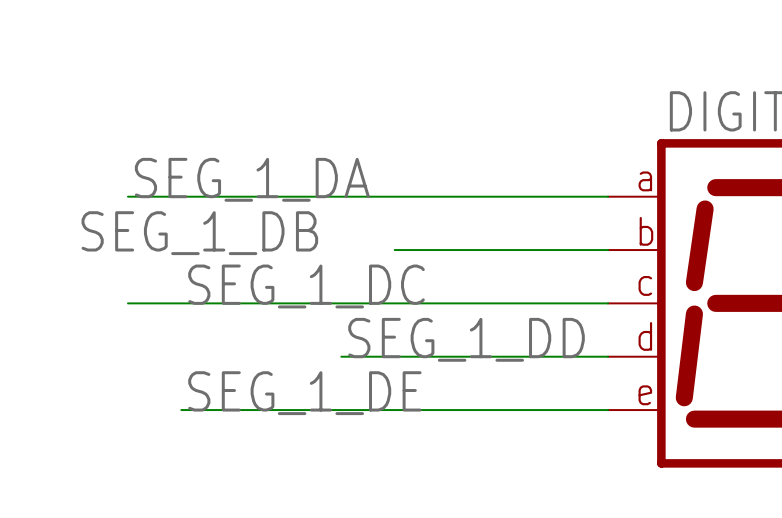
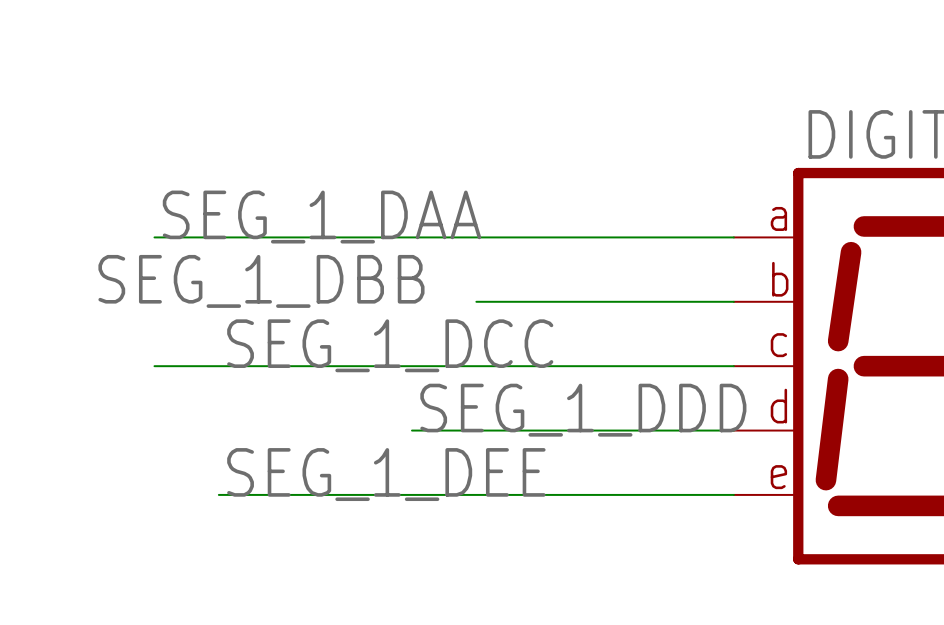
label: SEG_1_DA (252, 179) -> SEG_1_DAA (321, 217)
label: SEG_1_DB (199, 233) -> SEG_1_DBB (261, 281)
label: SEG_1_DC (306, 286) -> SEG_1_DCC (390, 345)
label: SEG_1_DD (466, 339) -> SEG_1_DDD (583, 410)
label: SEG_1_DE (304, 393) -> SEG_1_DEE (386, 474)

